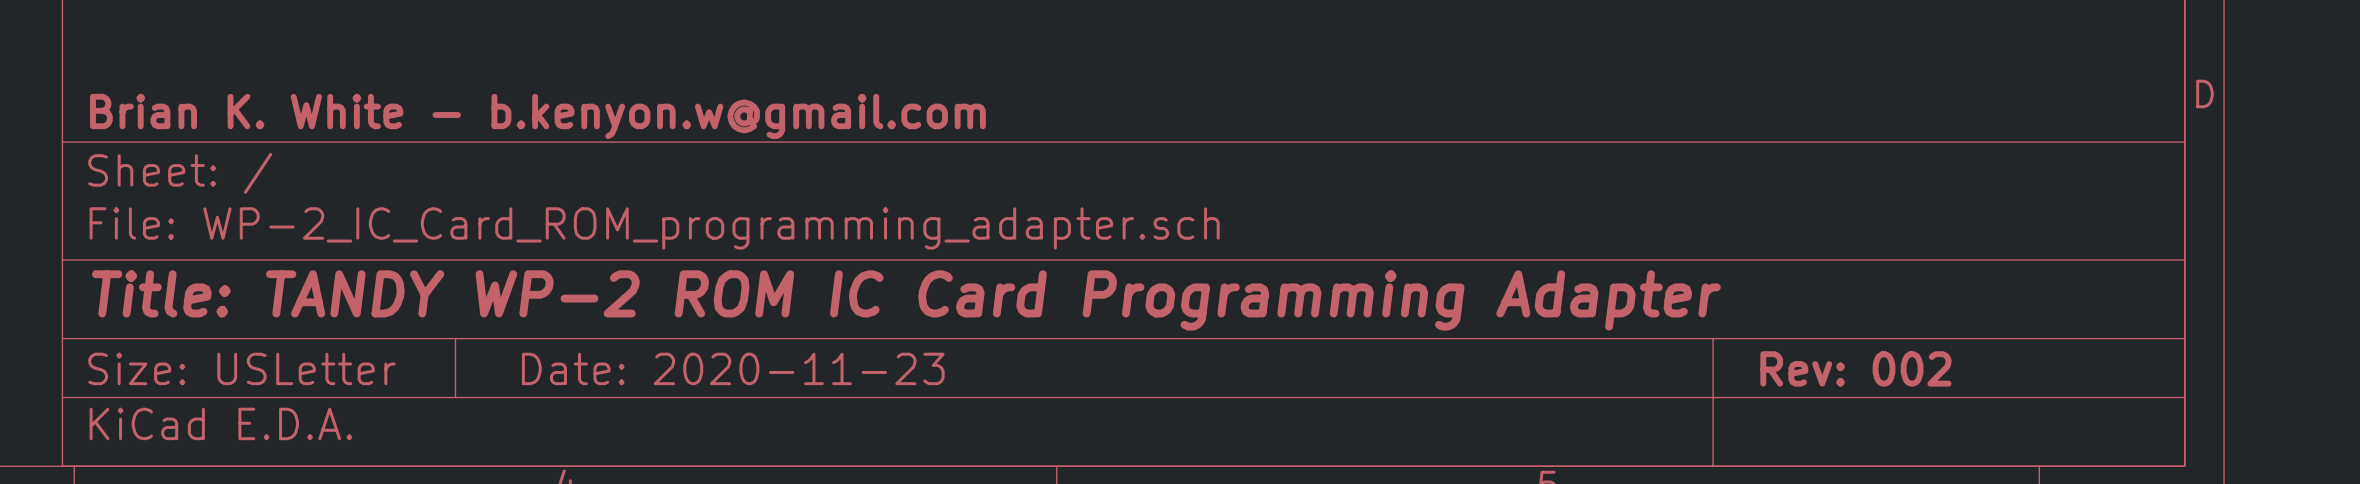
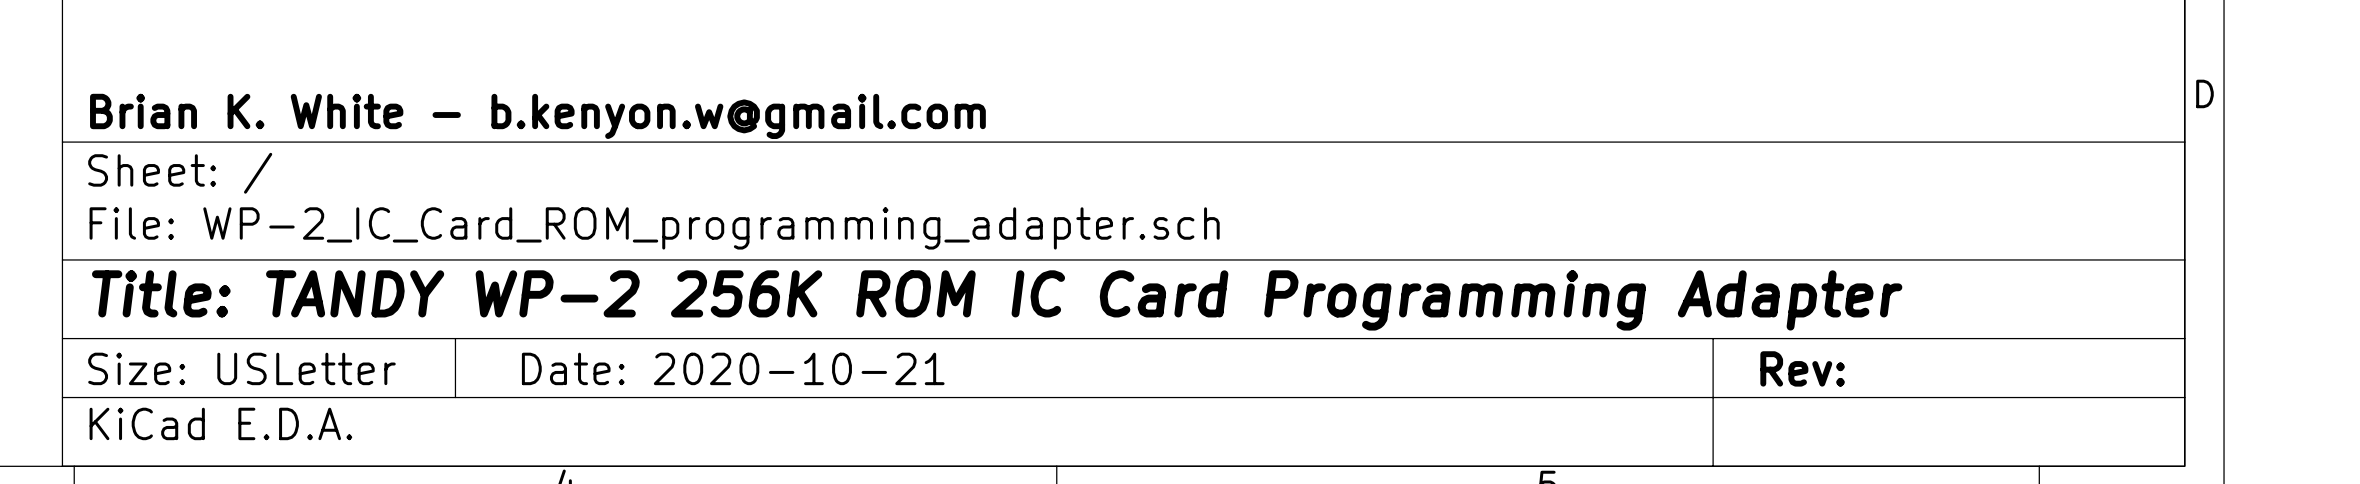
title block: Title: TANDY WP-2 ROM IC Card Programming Adapter (906, 300) -> Title: TANDY WP-2 256K ROM IC Card Programming Adapter (997, 300)
title block: Date: 2020-11-23 (733, 368) -> Date: 2020-10-21 (733, 368)
title block: Rev: 002 (1855, 368) -> Rev: (1802, 368)

